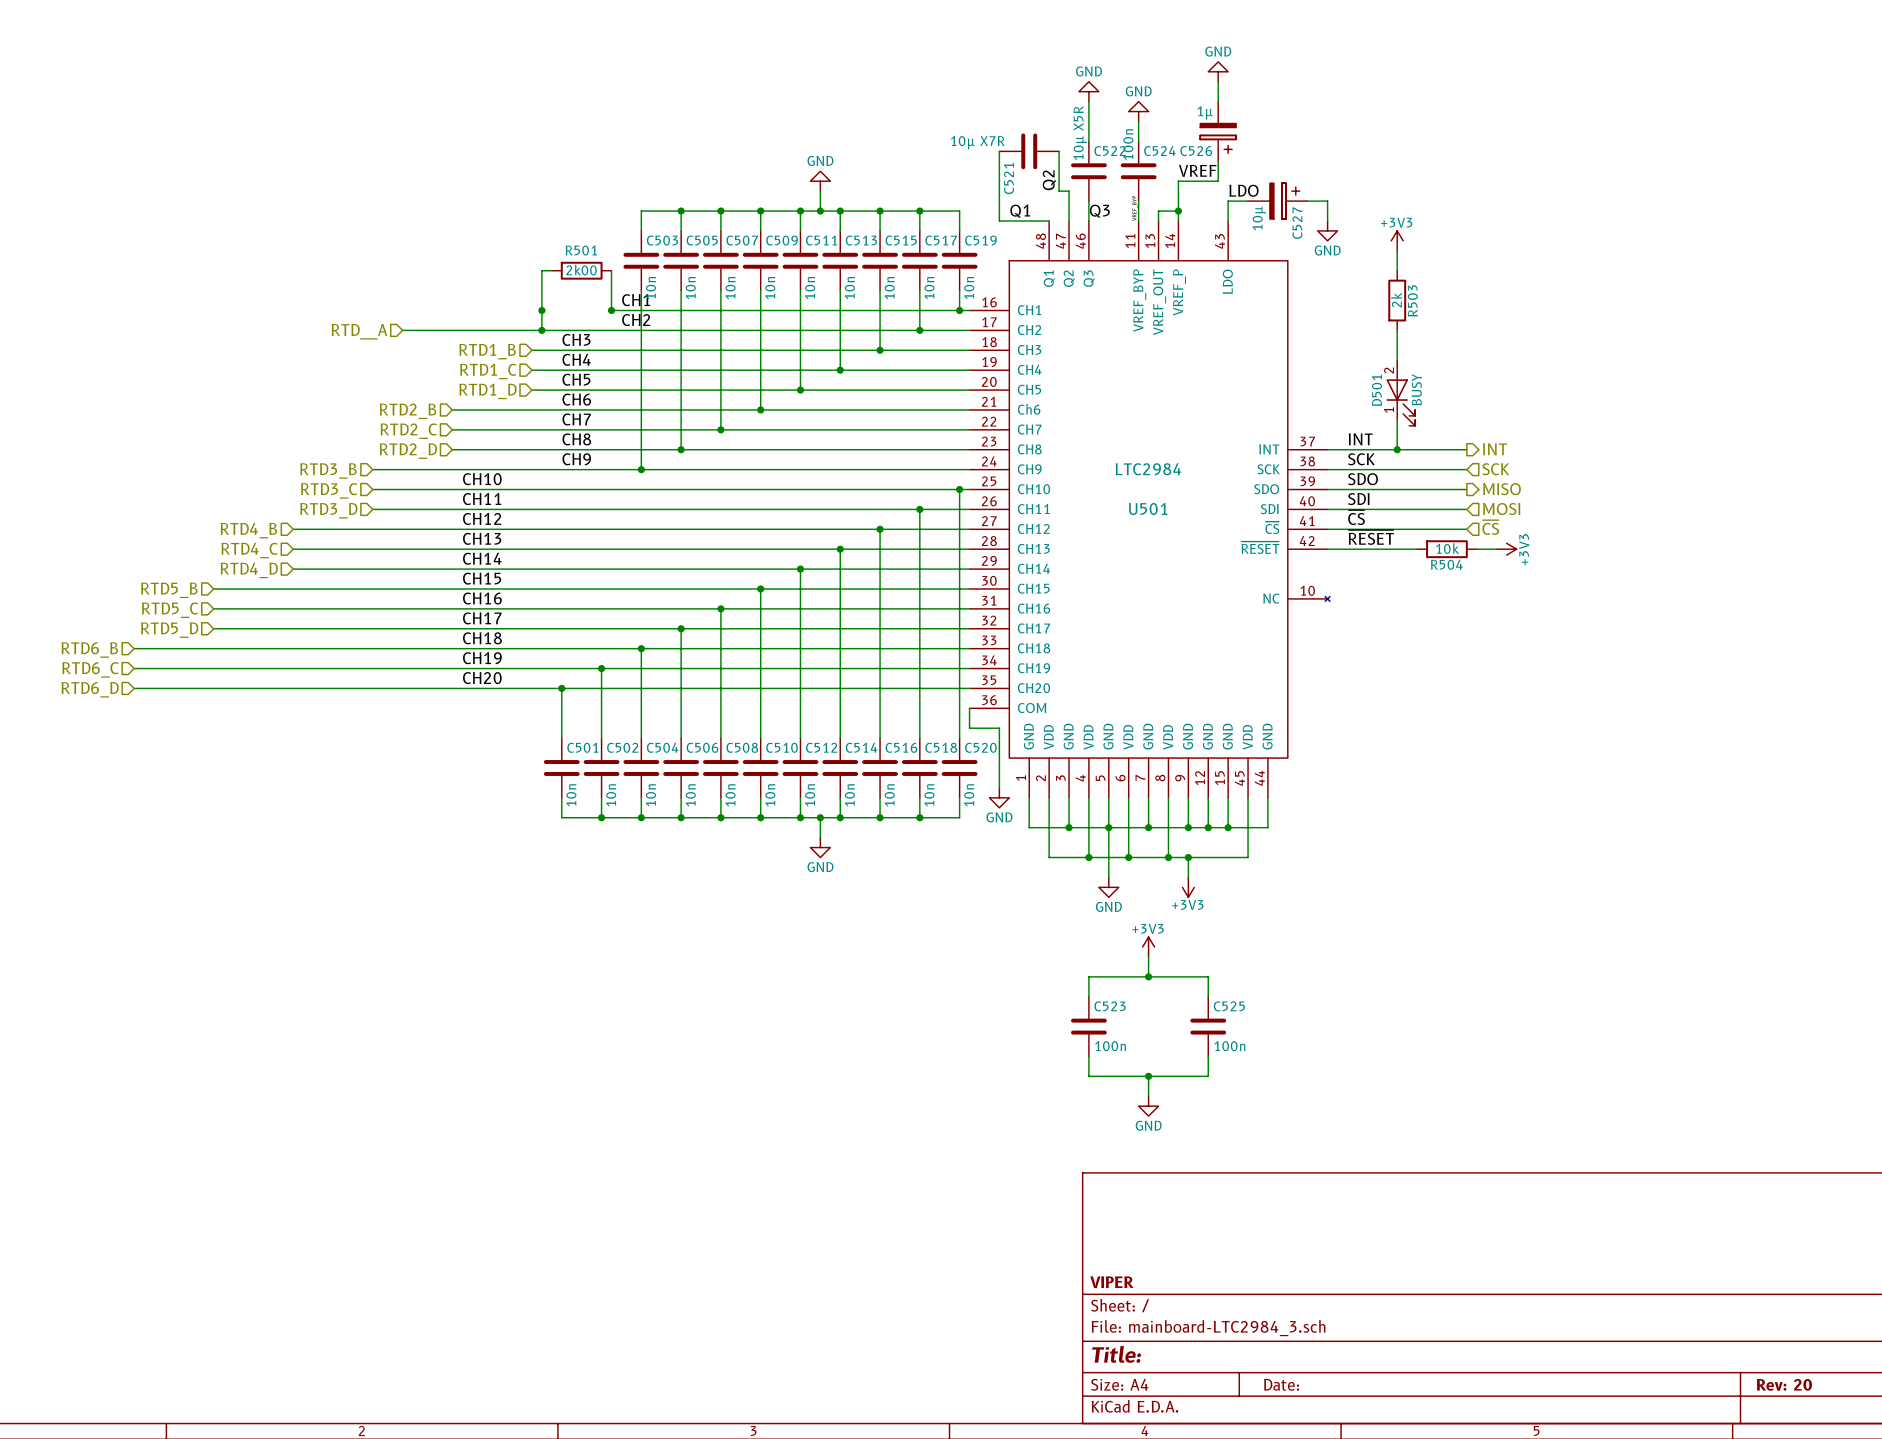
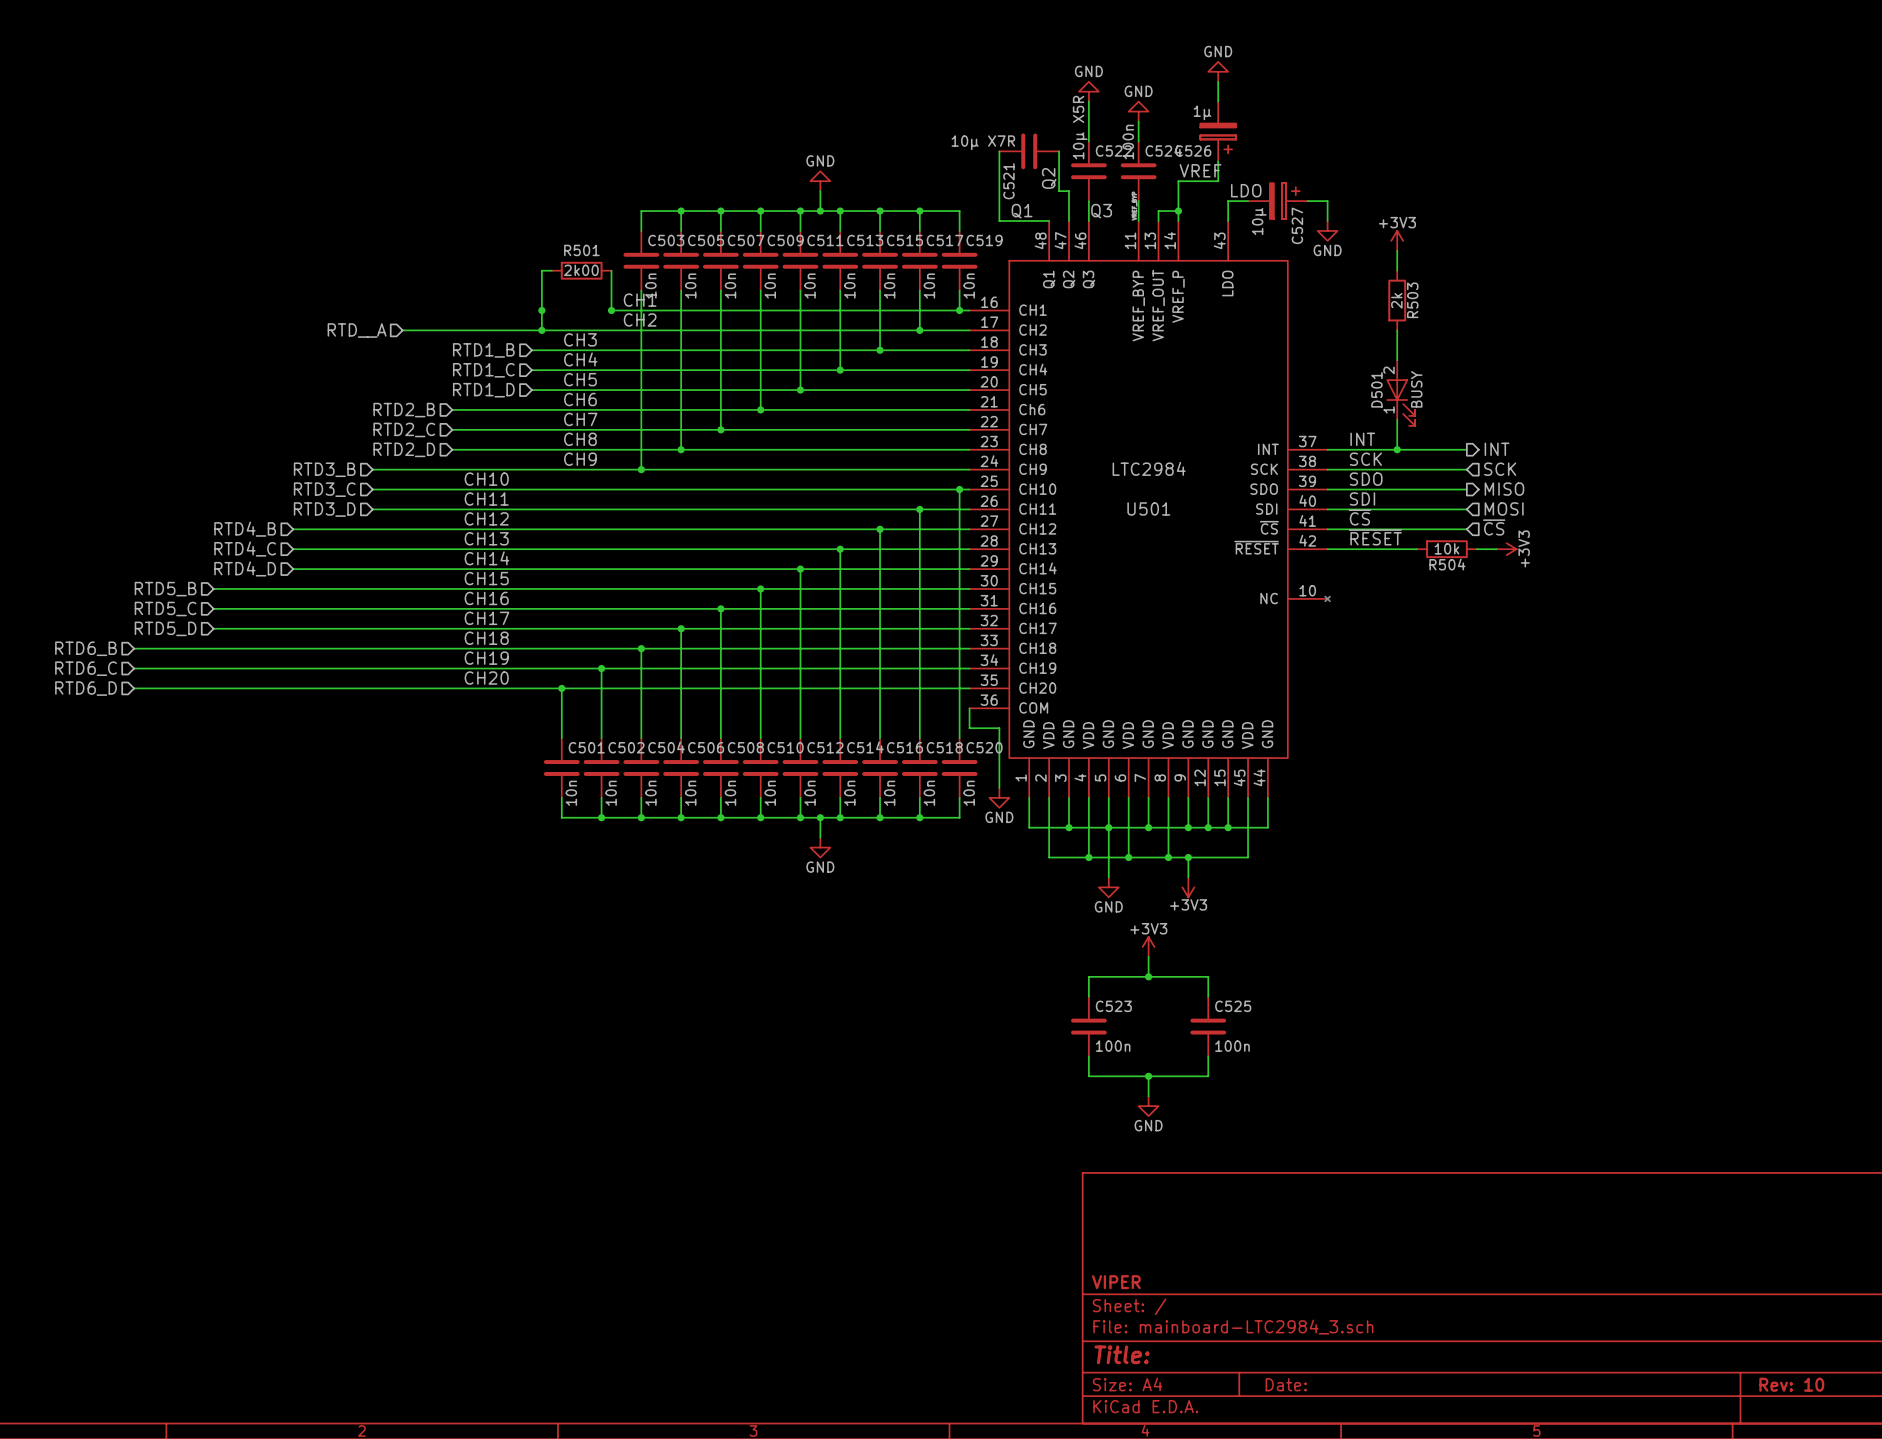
title block: Rev: 20 (1784, 1384) -> Rev: 10 (1791, 1384)

